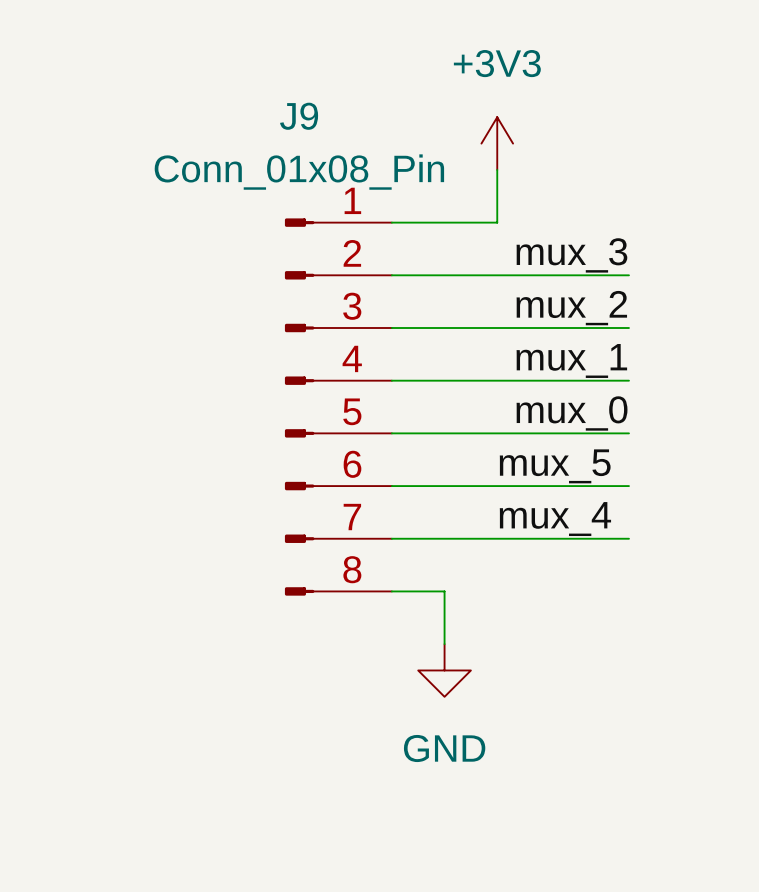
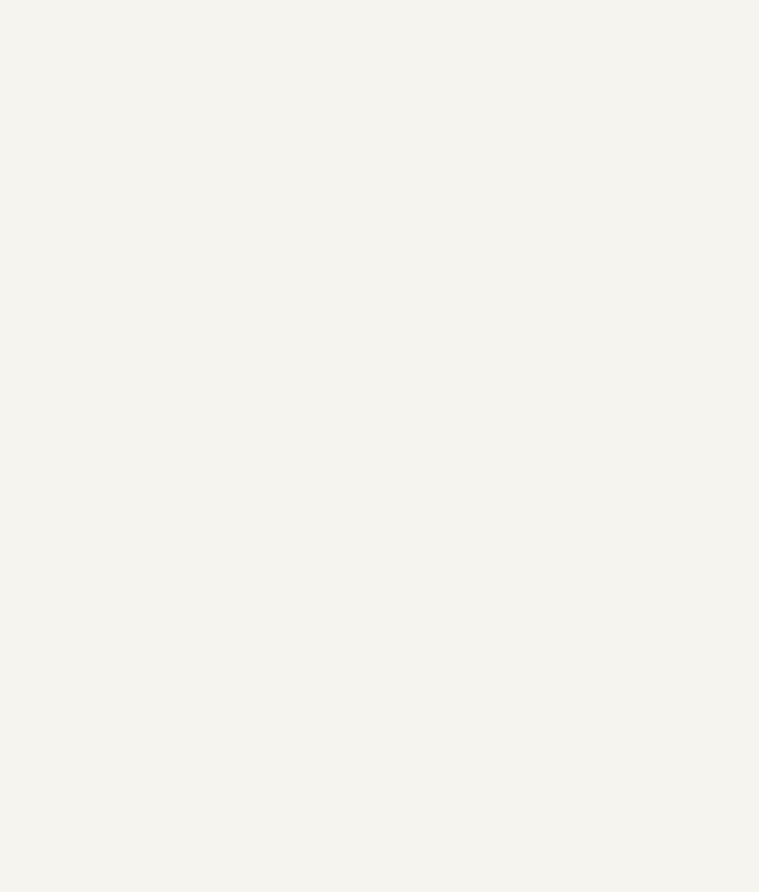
power symbol: +3V3 (497, 143) -> none
wire: (497, 169) (497, 222) (391, 222) -> none
label: mux_3 (571, 255) -> none
wire: (391, 275) (628, 275) -> none
label: mux_2 (571, 308) -> none
wire: (391, 328) (628, 328) -> none
label: mux_1 (571, 360) -> none
wire: (391, 380) (628, 380) -> none
J9: Conn_01x08_Pin (338, 407) -> none
label: mux_0 (572, 413) -> none
wire: (391, 433) (628, 433) -> none
label: mux_5 (555, 466) -> none
wire: (391, 486) (628, 486) -> none
label: mux_4 (555, 519) -> none
wire: (391, 538) (628, 538) -> none
wire: (391, 591) (444, 591) (444, 644) -> none
power symbol: GND (444, 670) -> none

